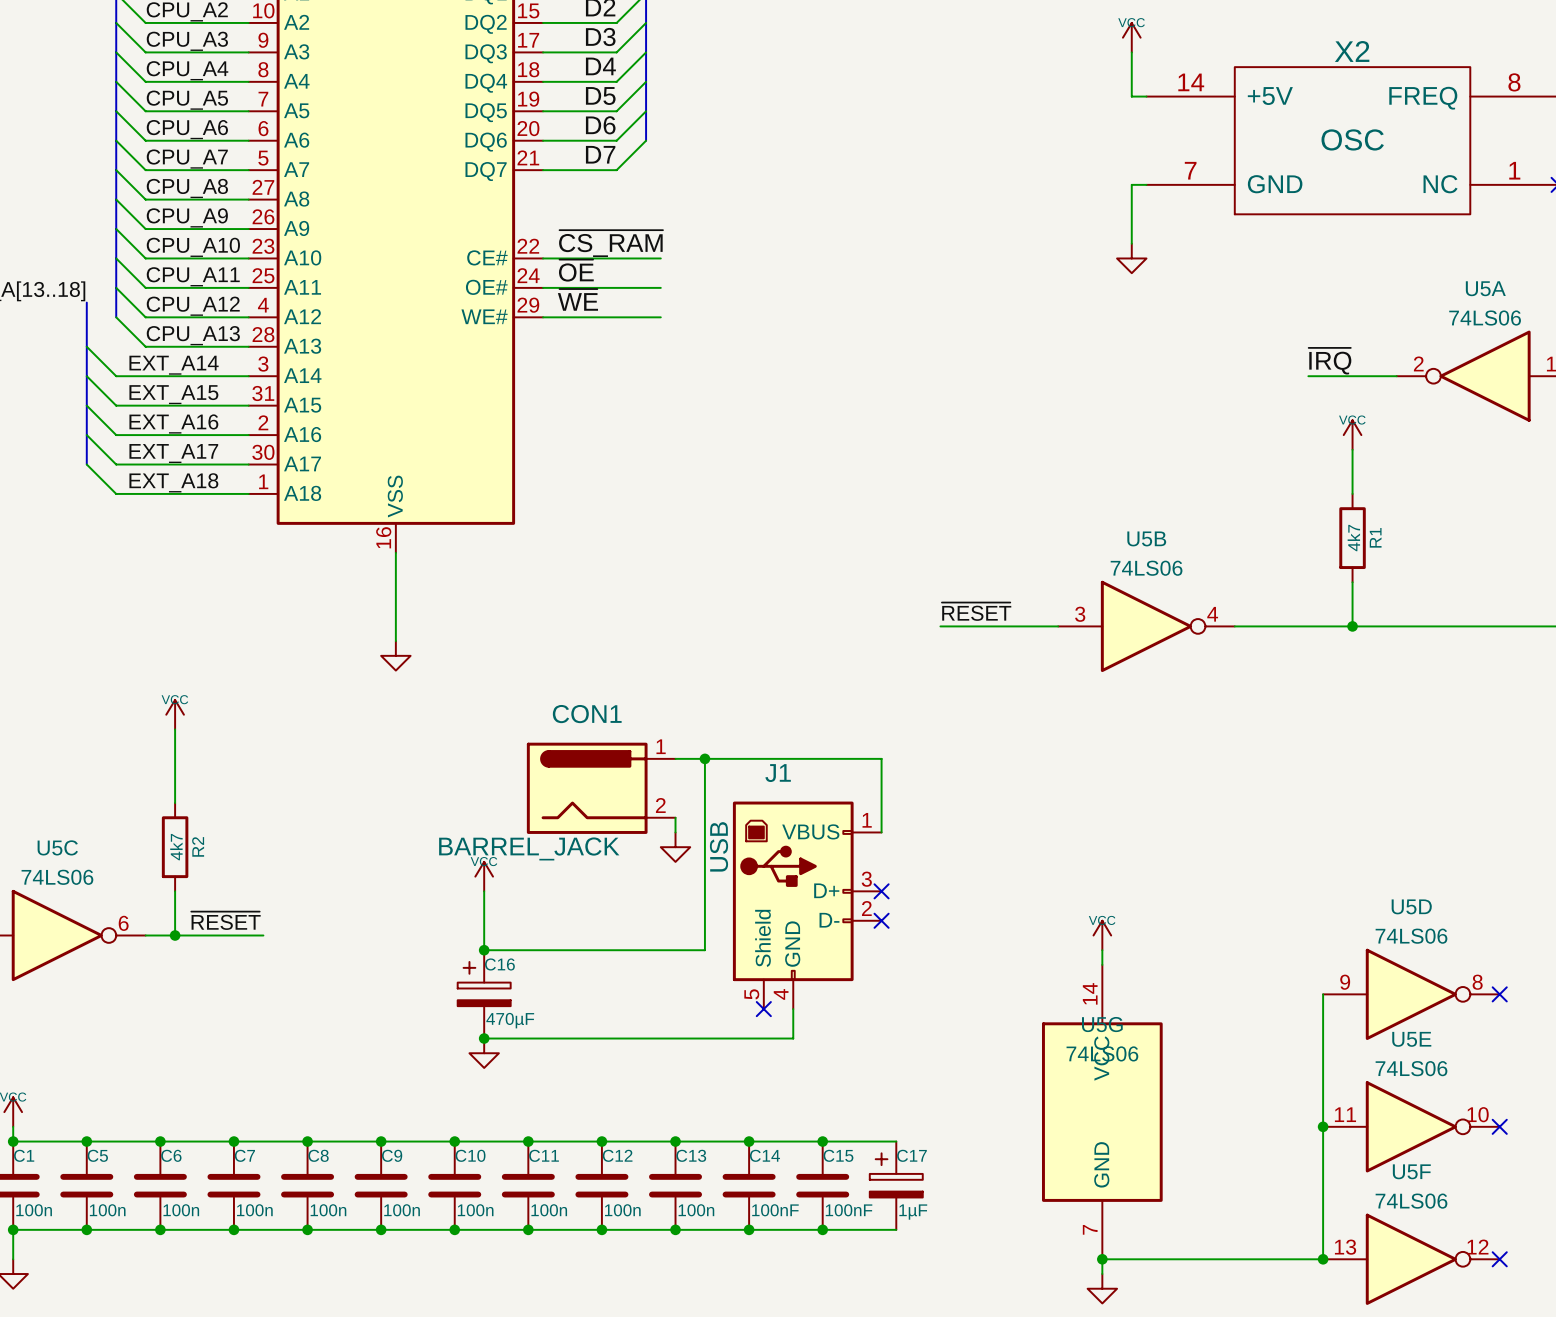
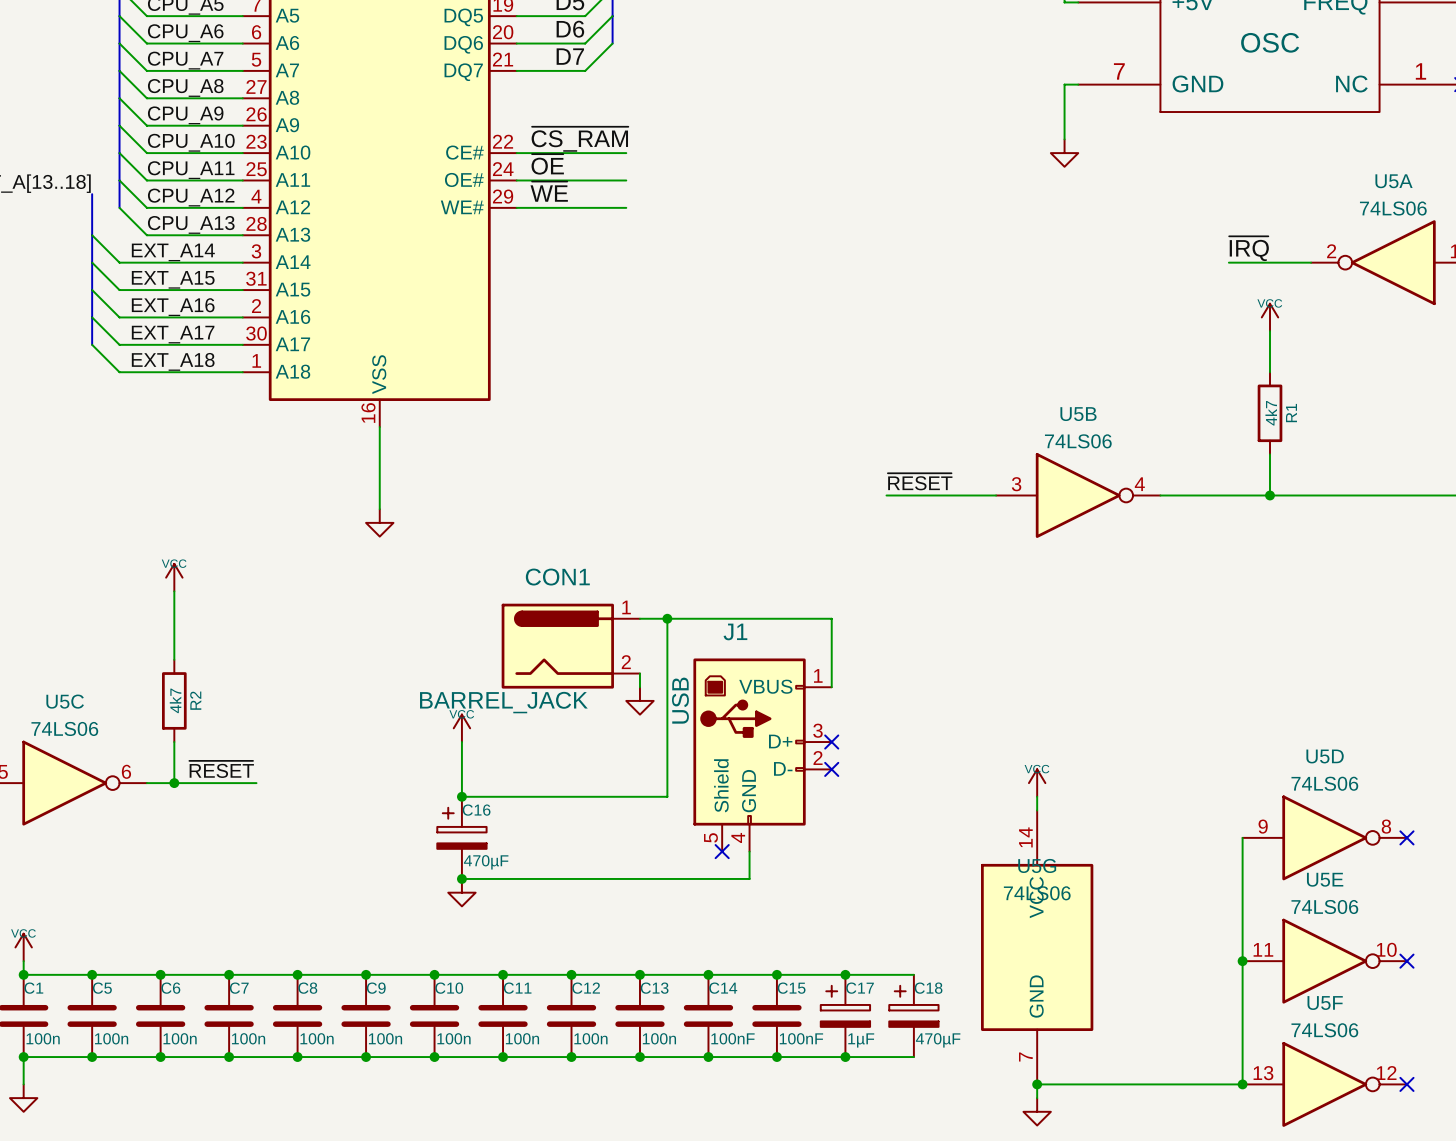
wire: none -> (845, 974) (913, 974)
junction: none -> (845, 974)
C18: none -> 470µF (913, 1015)
wire: none -> (845, 1057) (913, 1057)
junction: none -> (845, 1057)

